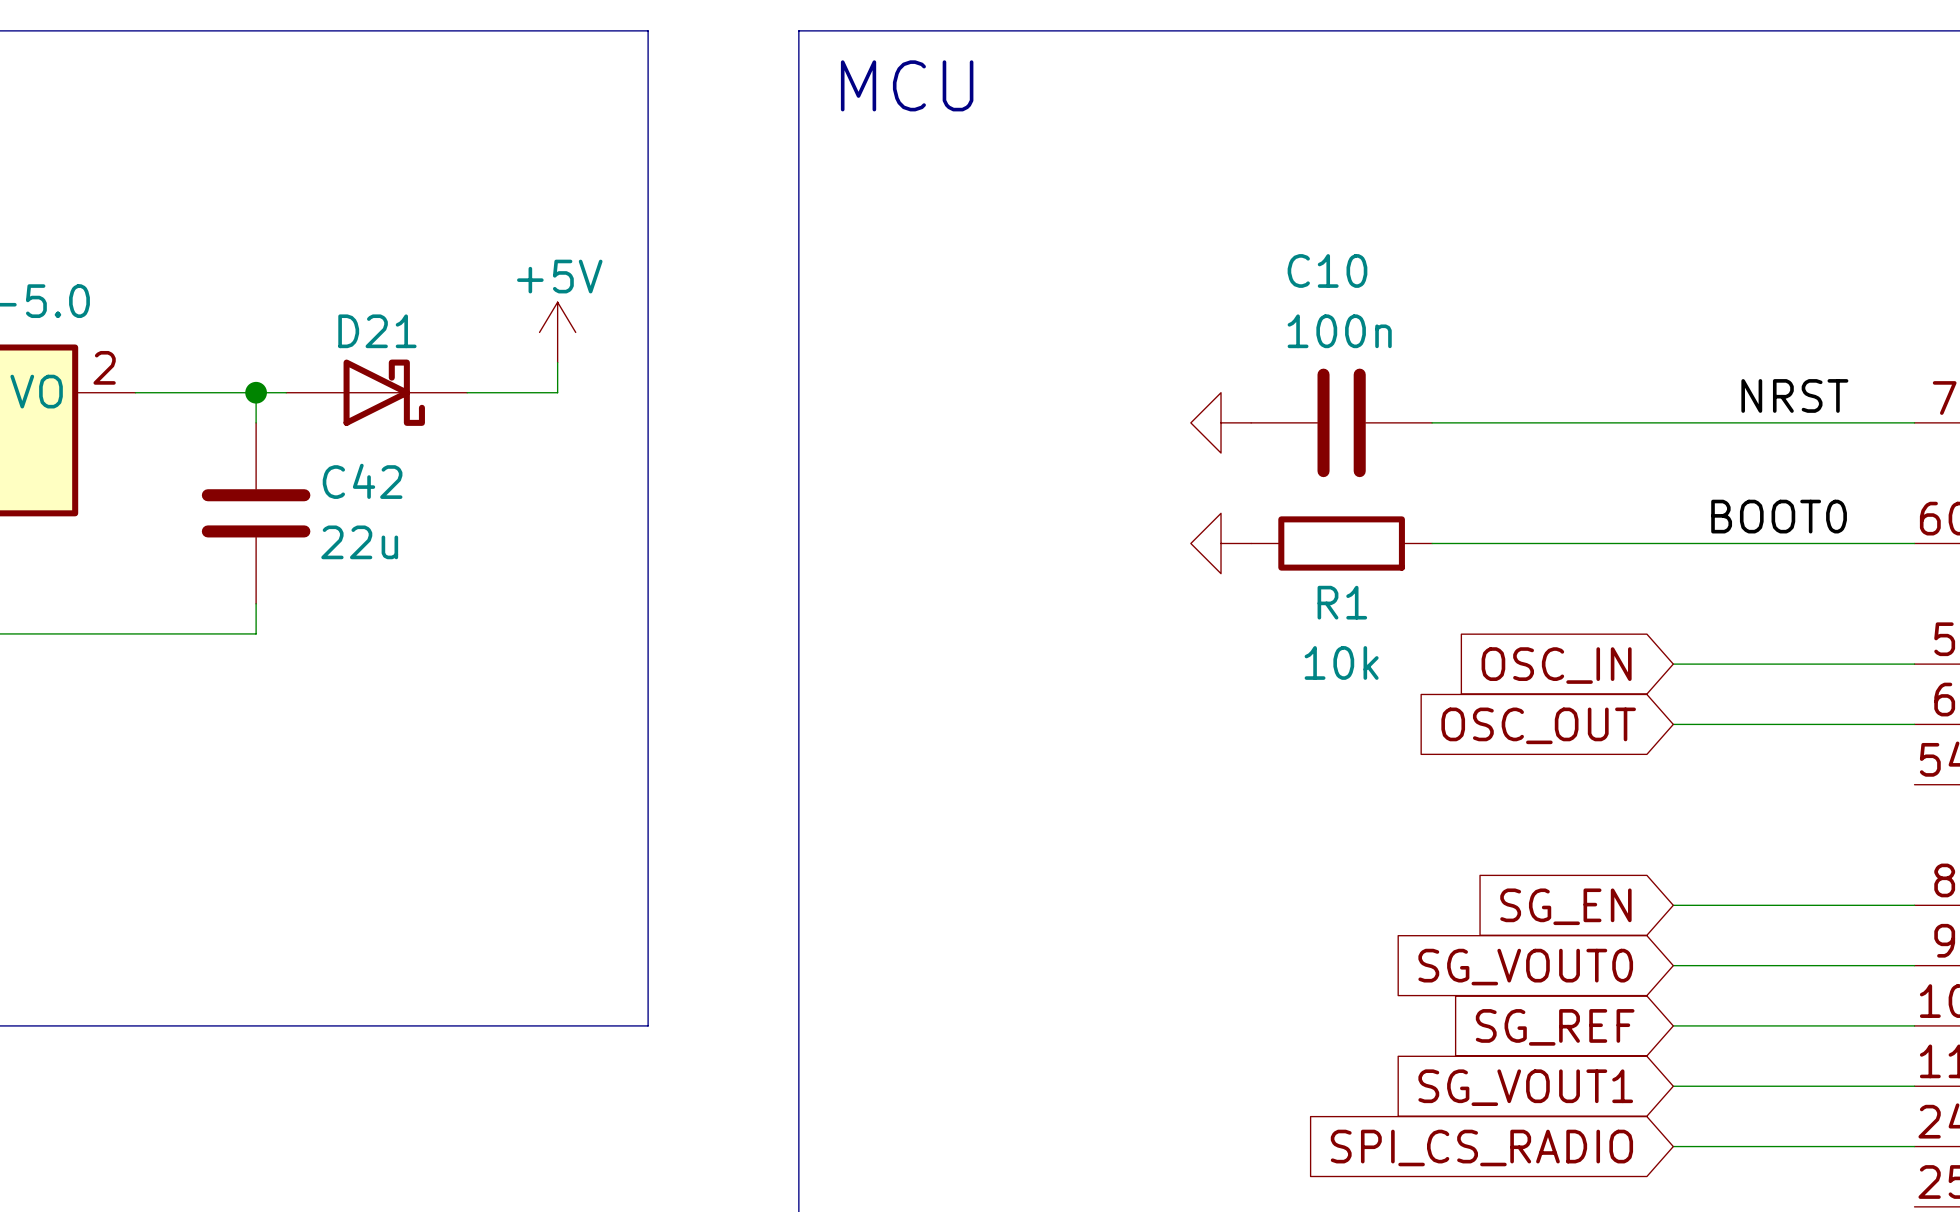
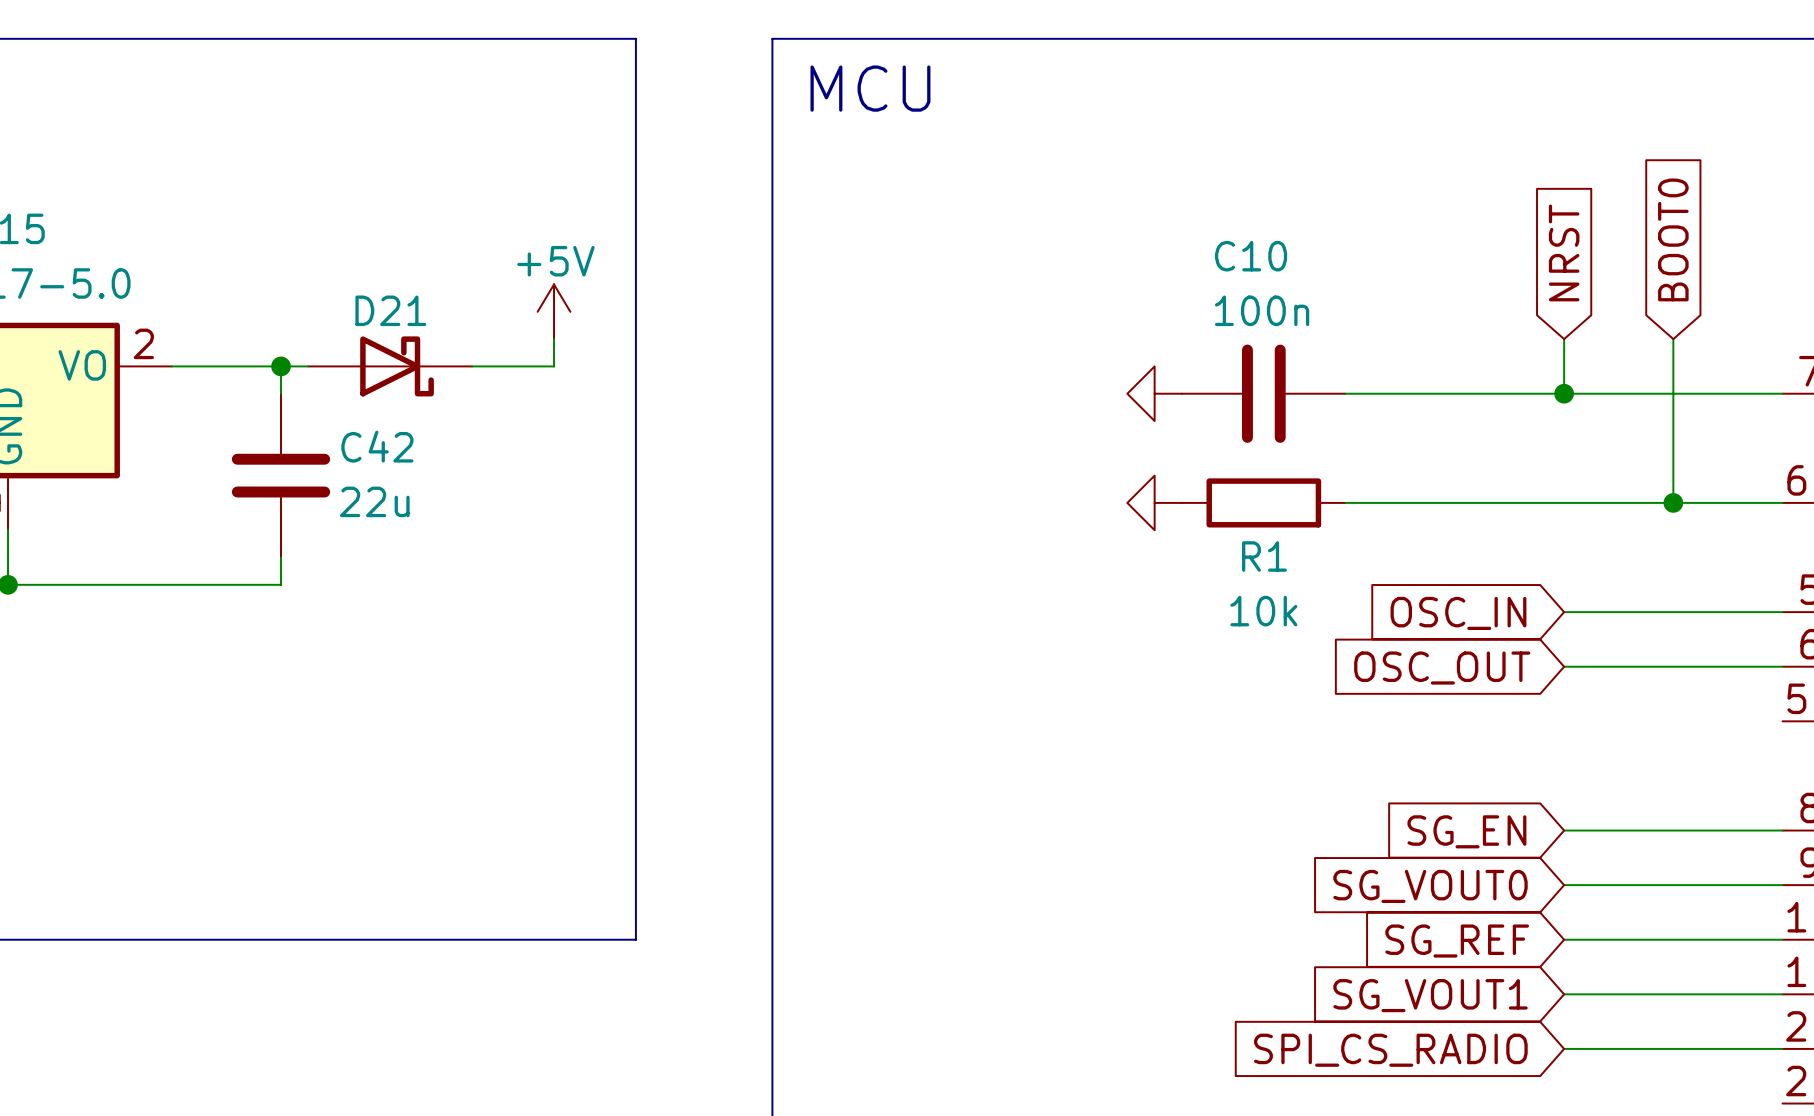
global label: none -> BOOT0 (1673, 239)
global label: none -> NRST (1564, 252)
wire: none -> (1564, 339) (1564, 393)
wire: none -> (1673, 339) (1673, 502)
label: NRST (1794, 395) -> none
junction: none -> (1564, 393)
label: BOOT0 (1779, 516) -> none
junction: none -> (1673, 502)

